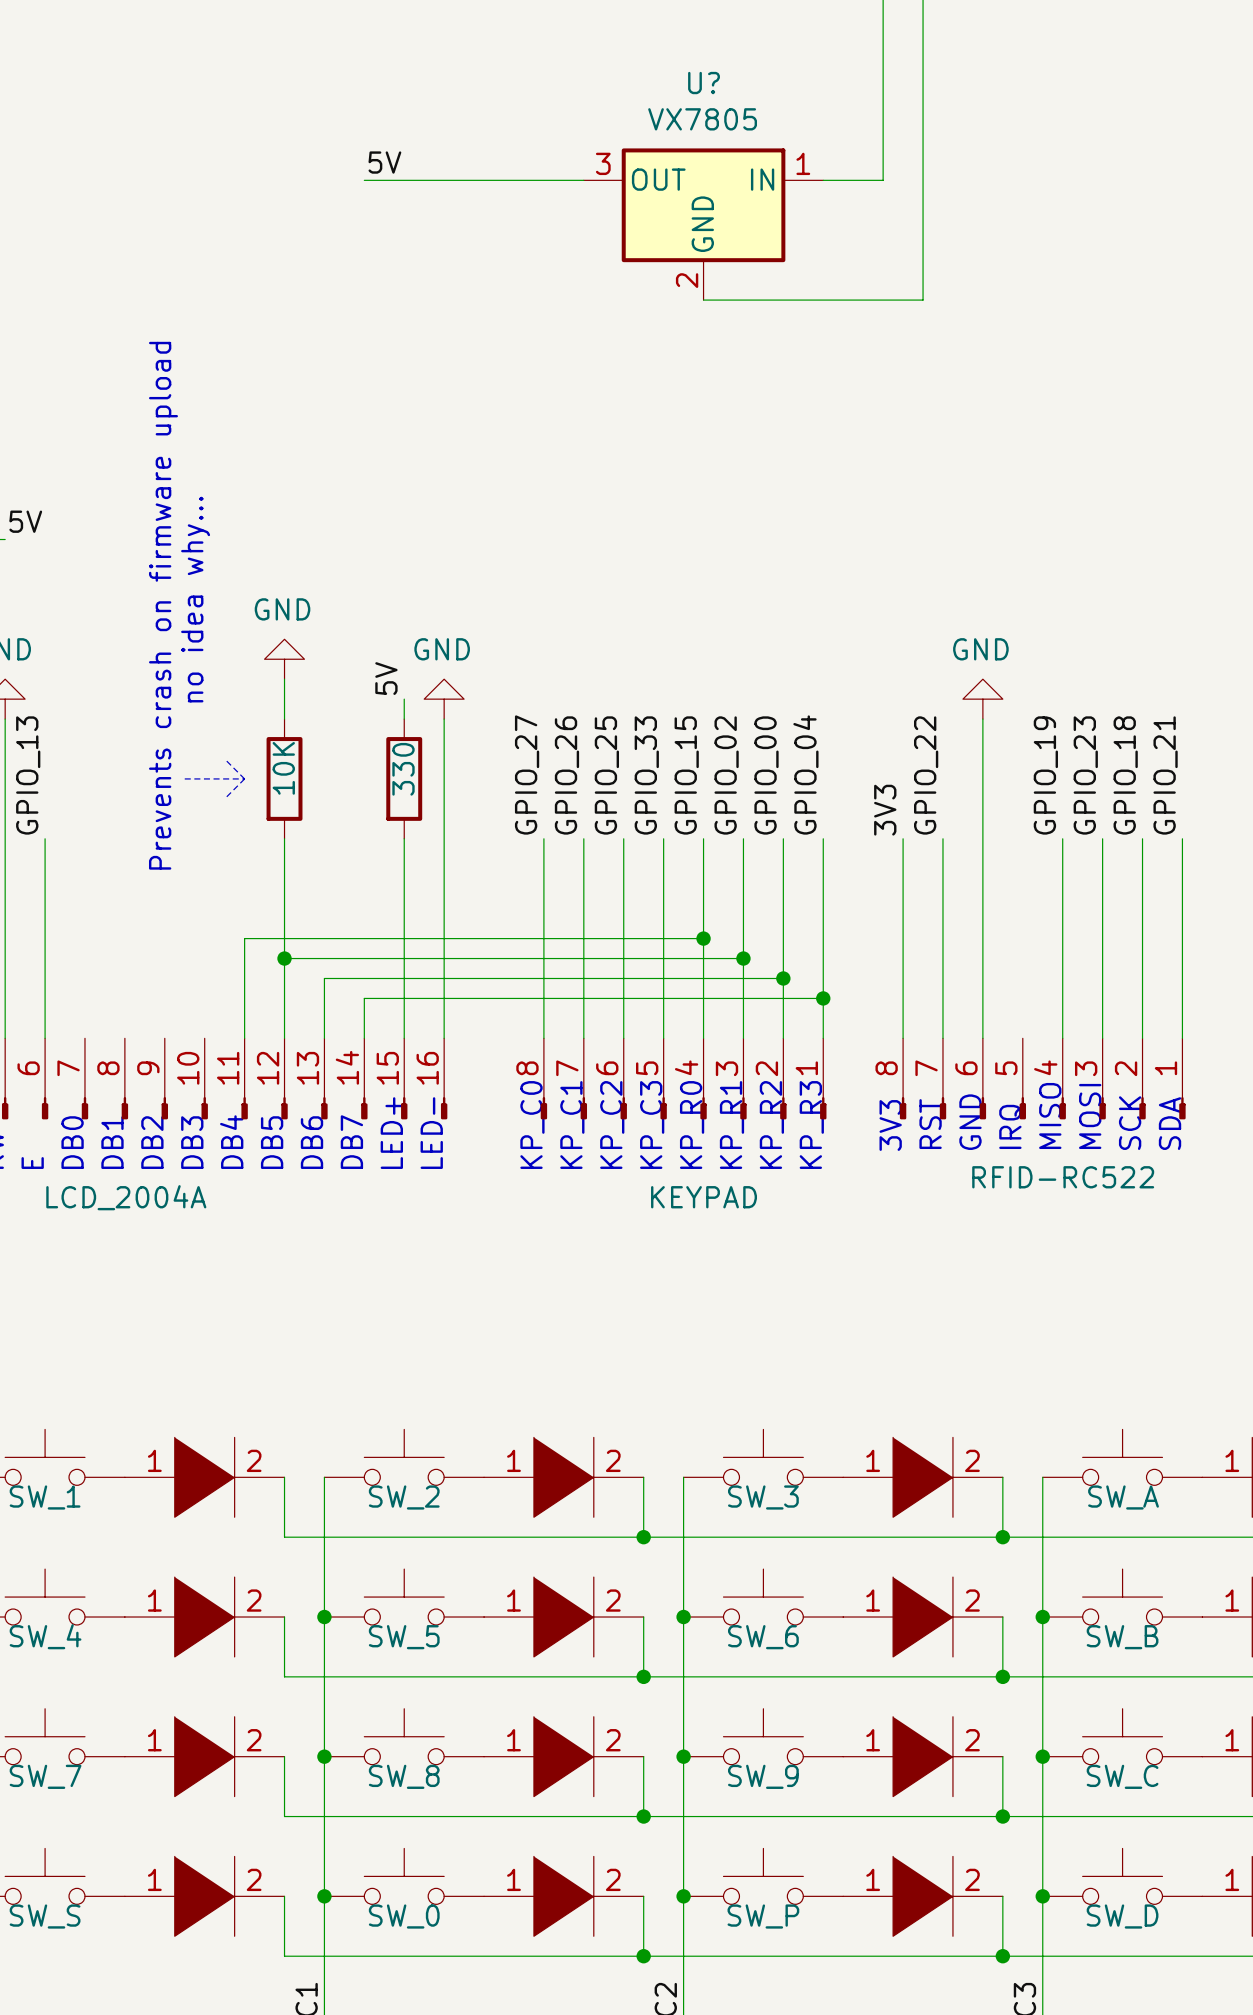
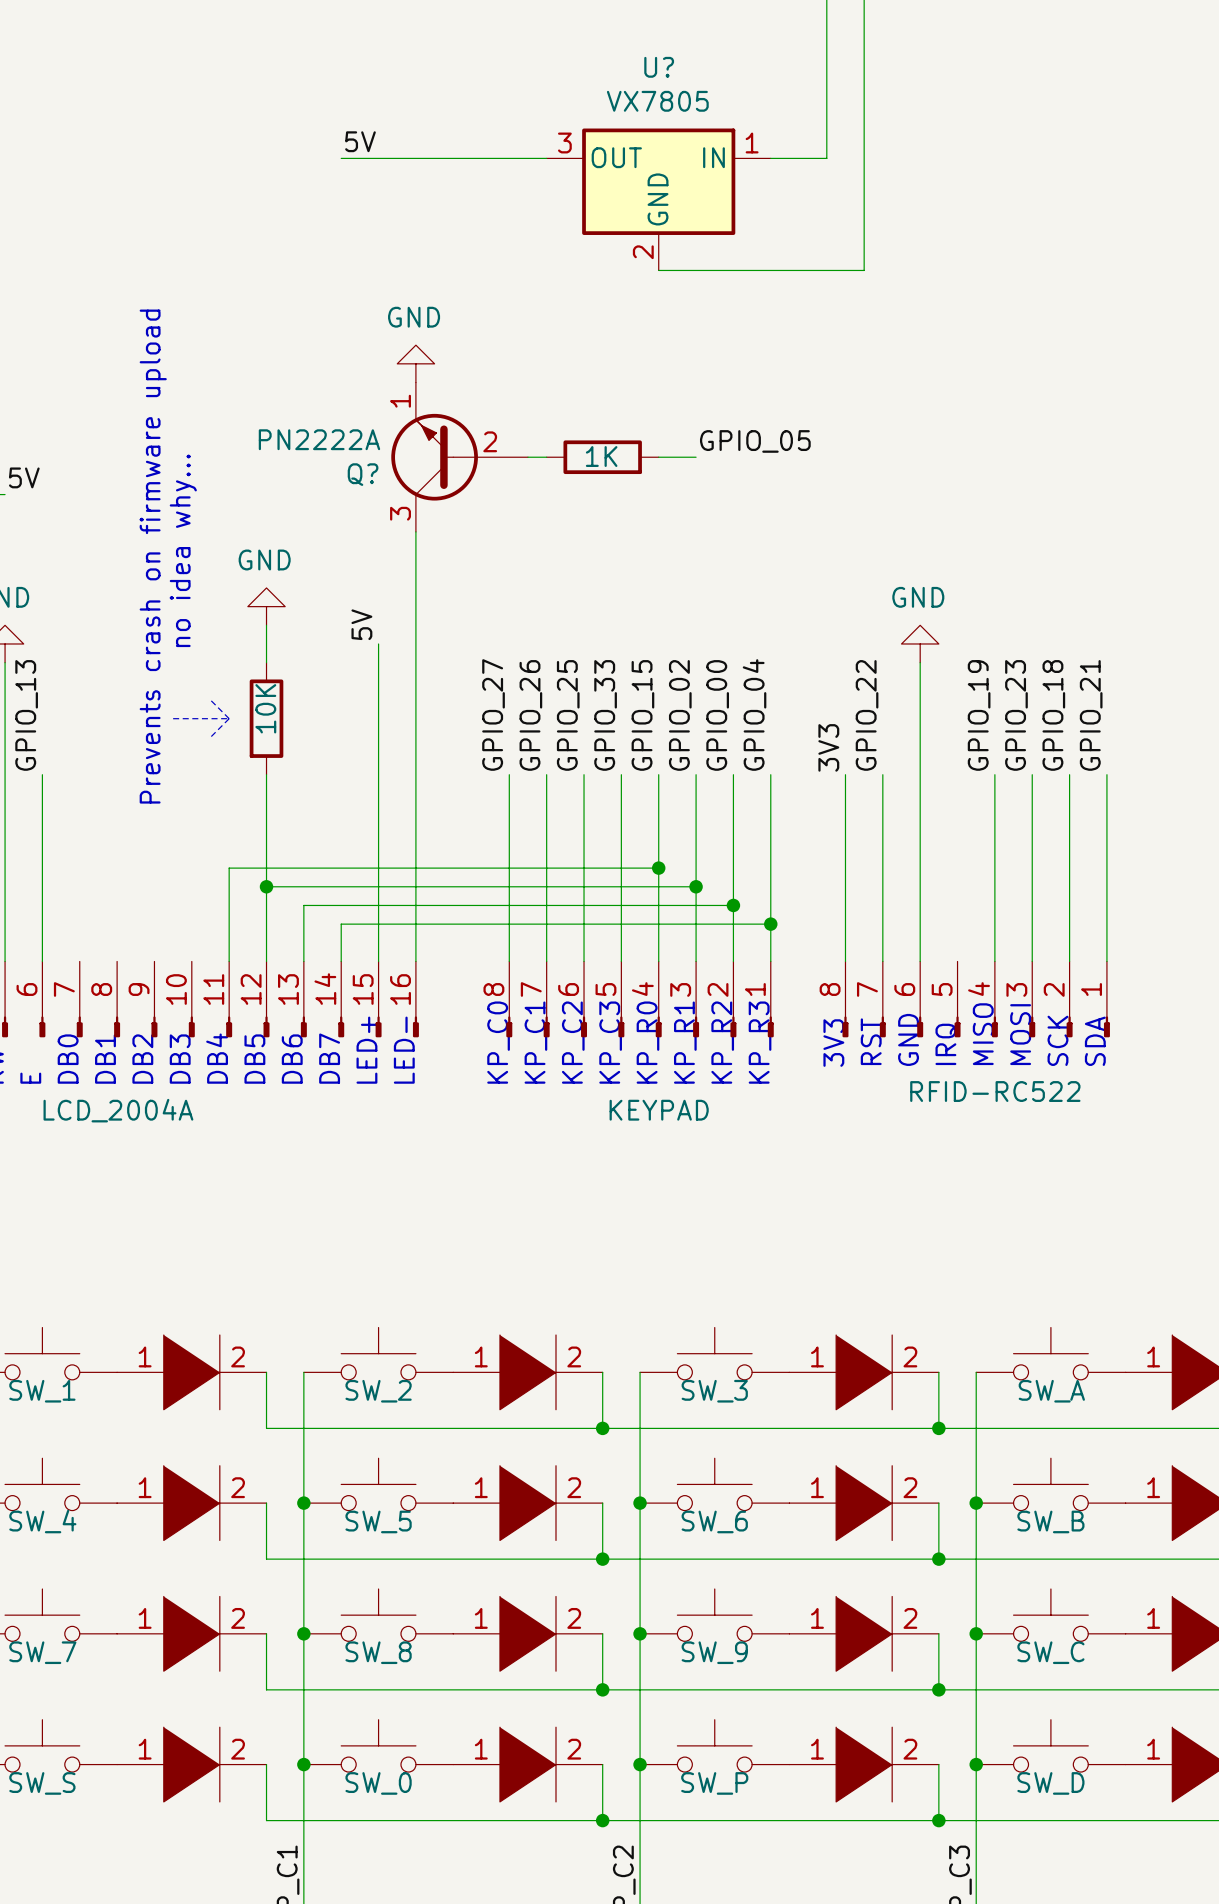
label: none -> GPIO_05 (755, 441)
Q?: none -> PN2222A (459, 457)
wire: none -> (527, 457) (546, 457)
part: none -> 1K (602, 457)
wire: none -> (658, 457) (696, 457)
wire: none -> (415, 531) (415, 662)
power symbol position: GND (444, 699) -> GND (415, 363)
wire: none -> (378, 662) (378, 774)
part: 330 (404, 778) -> none

